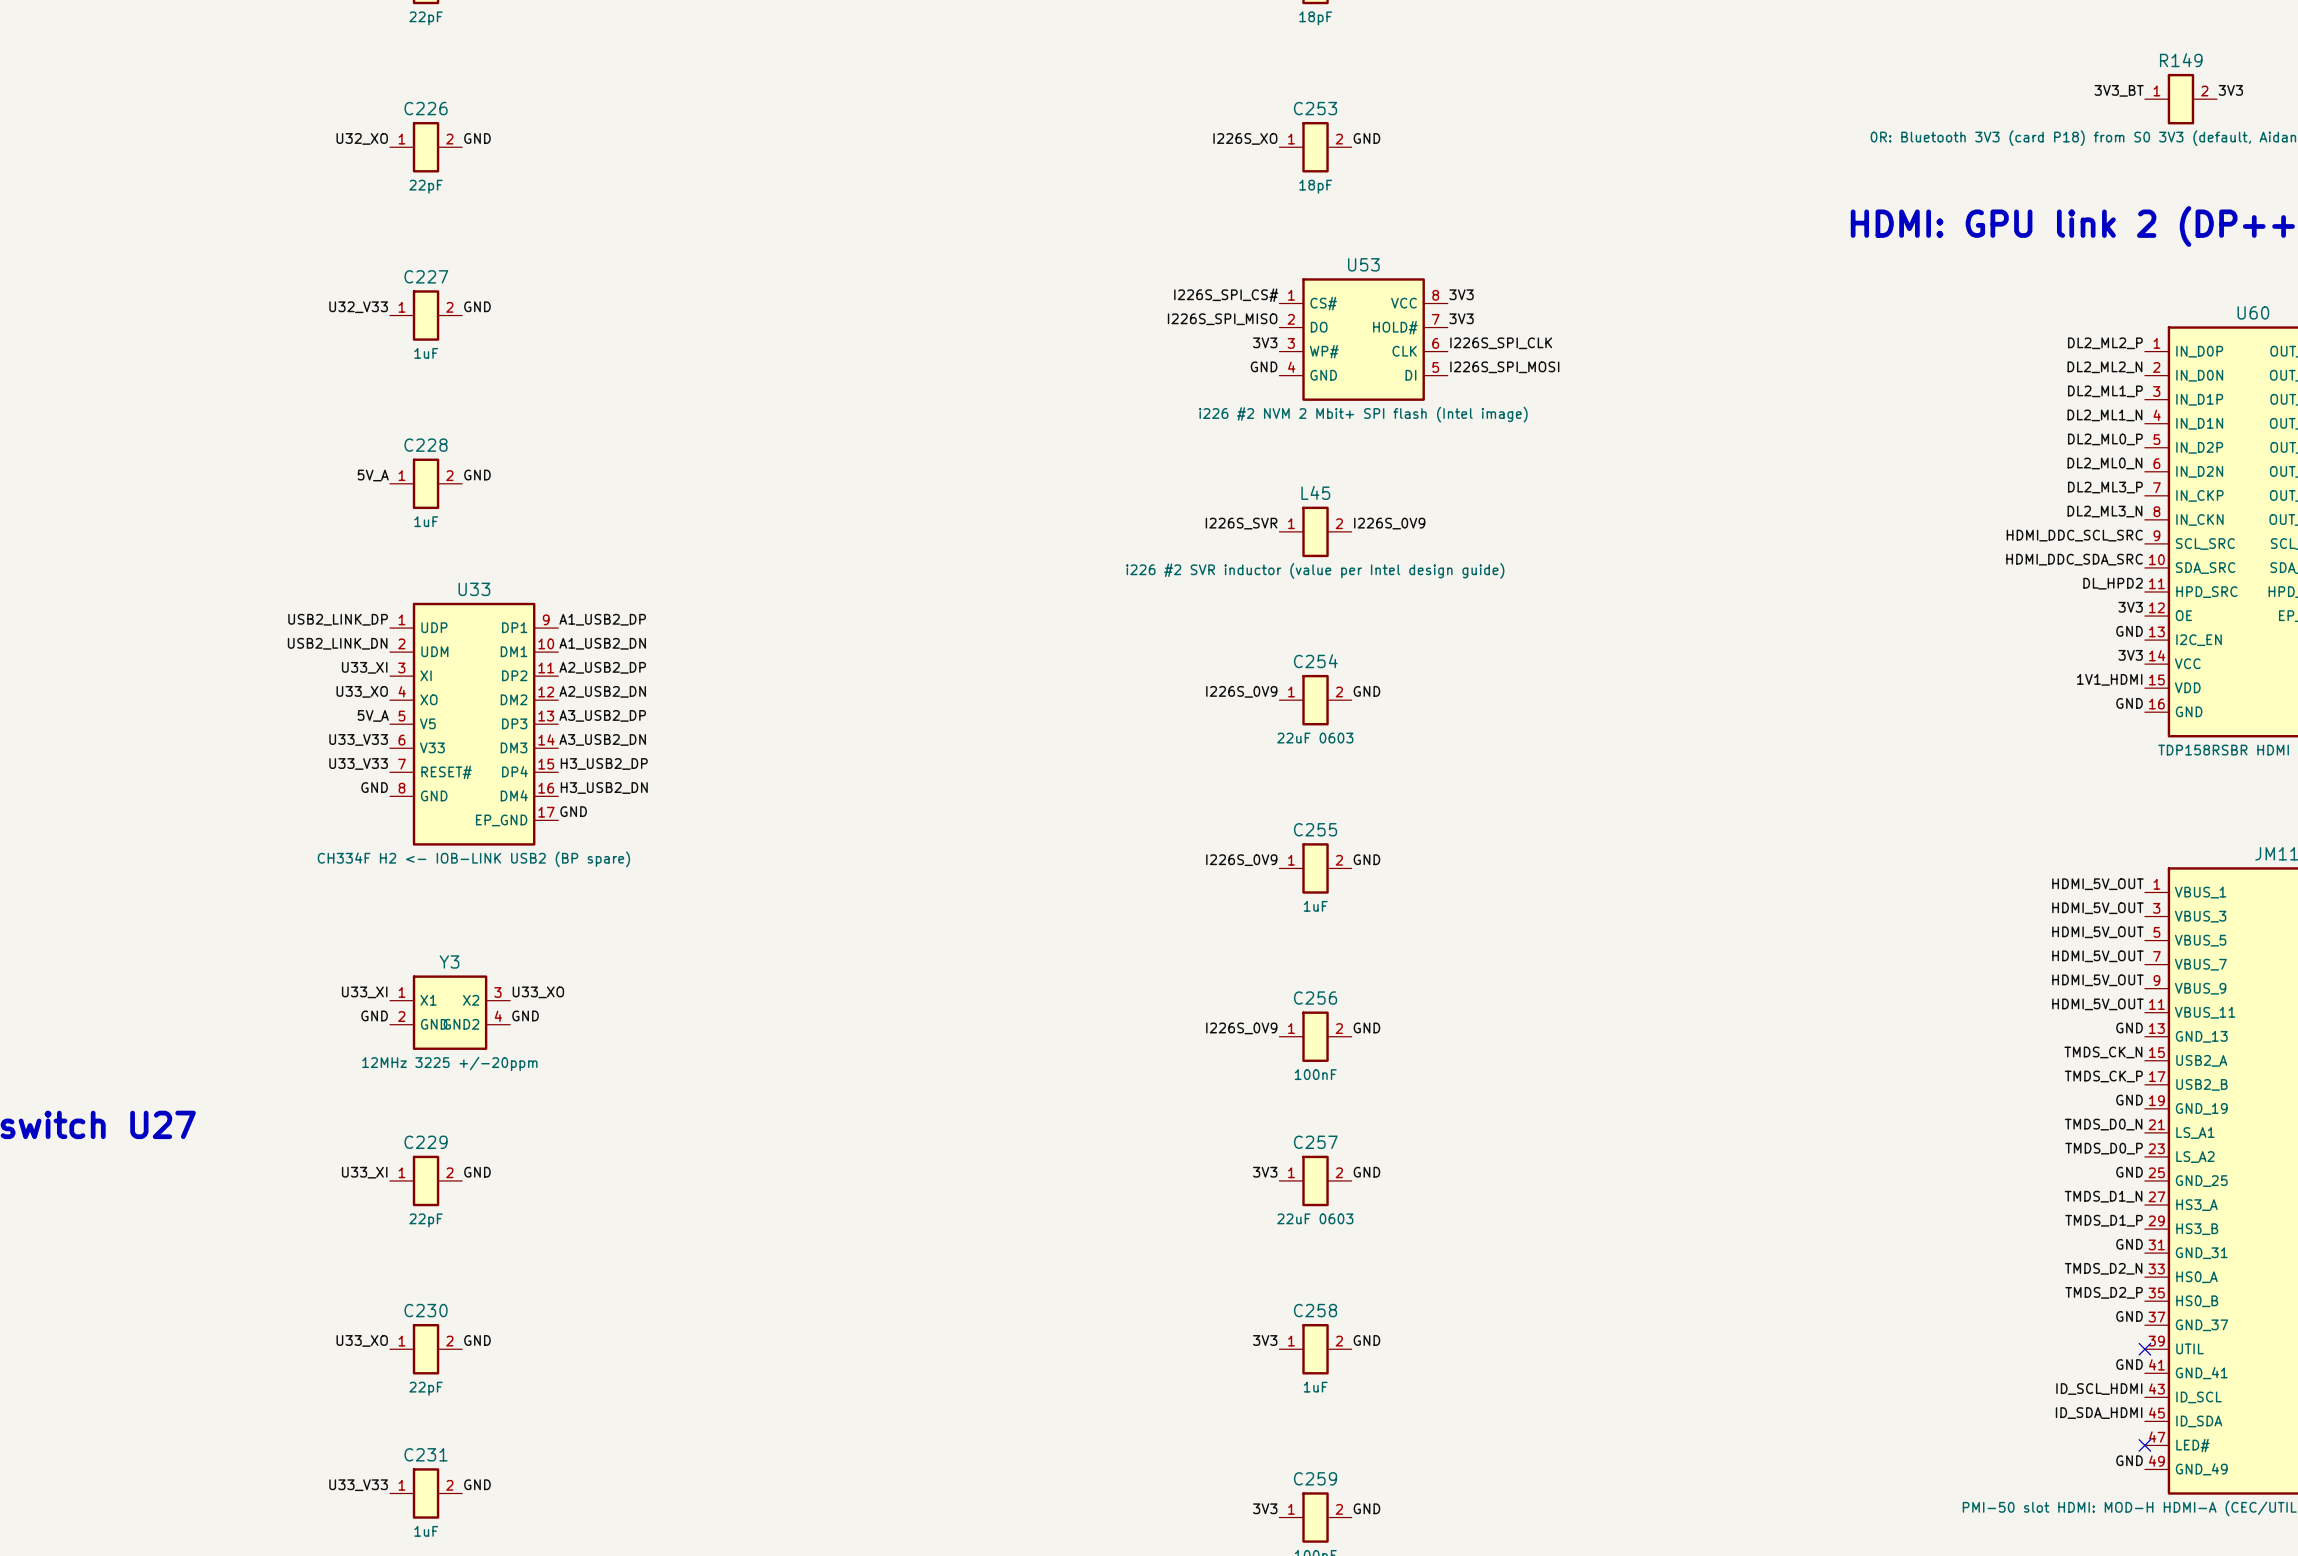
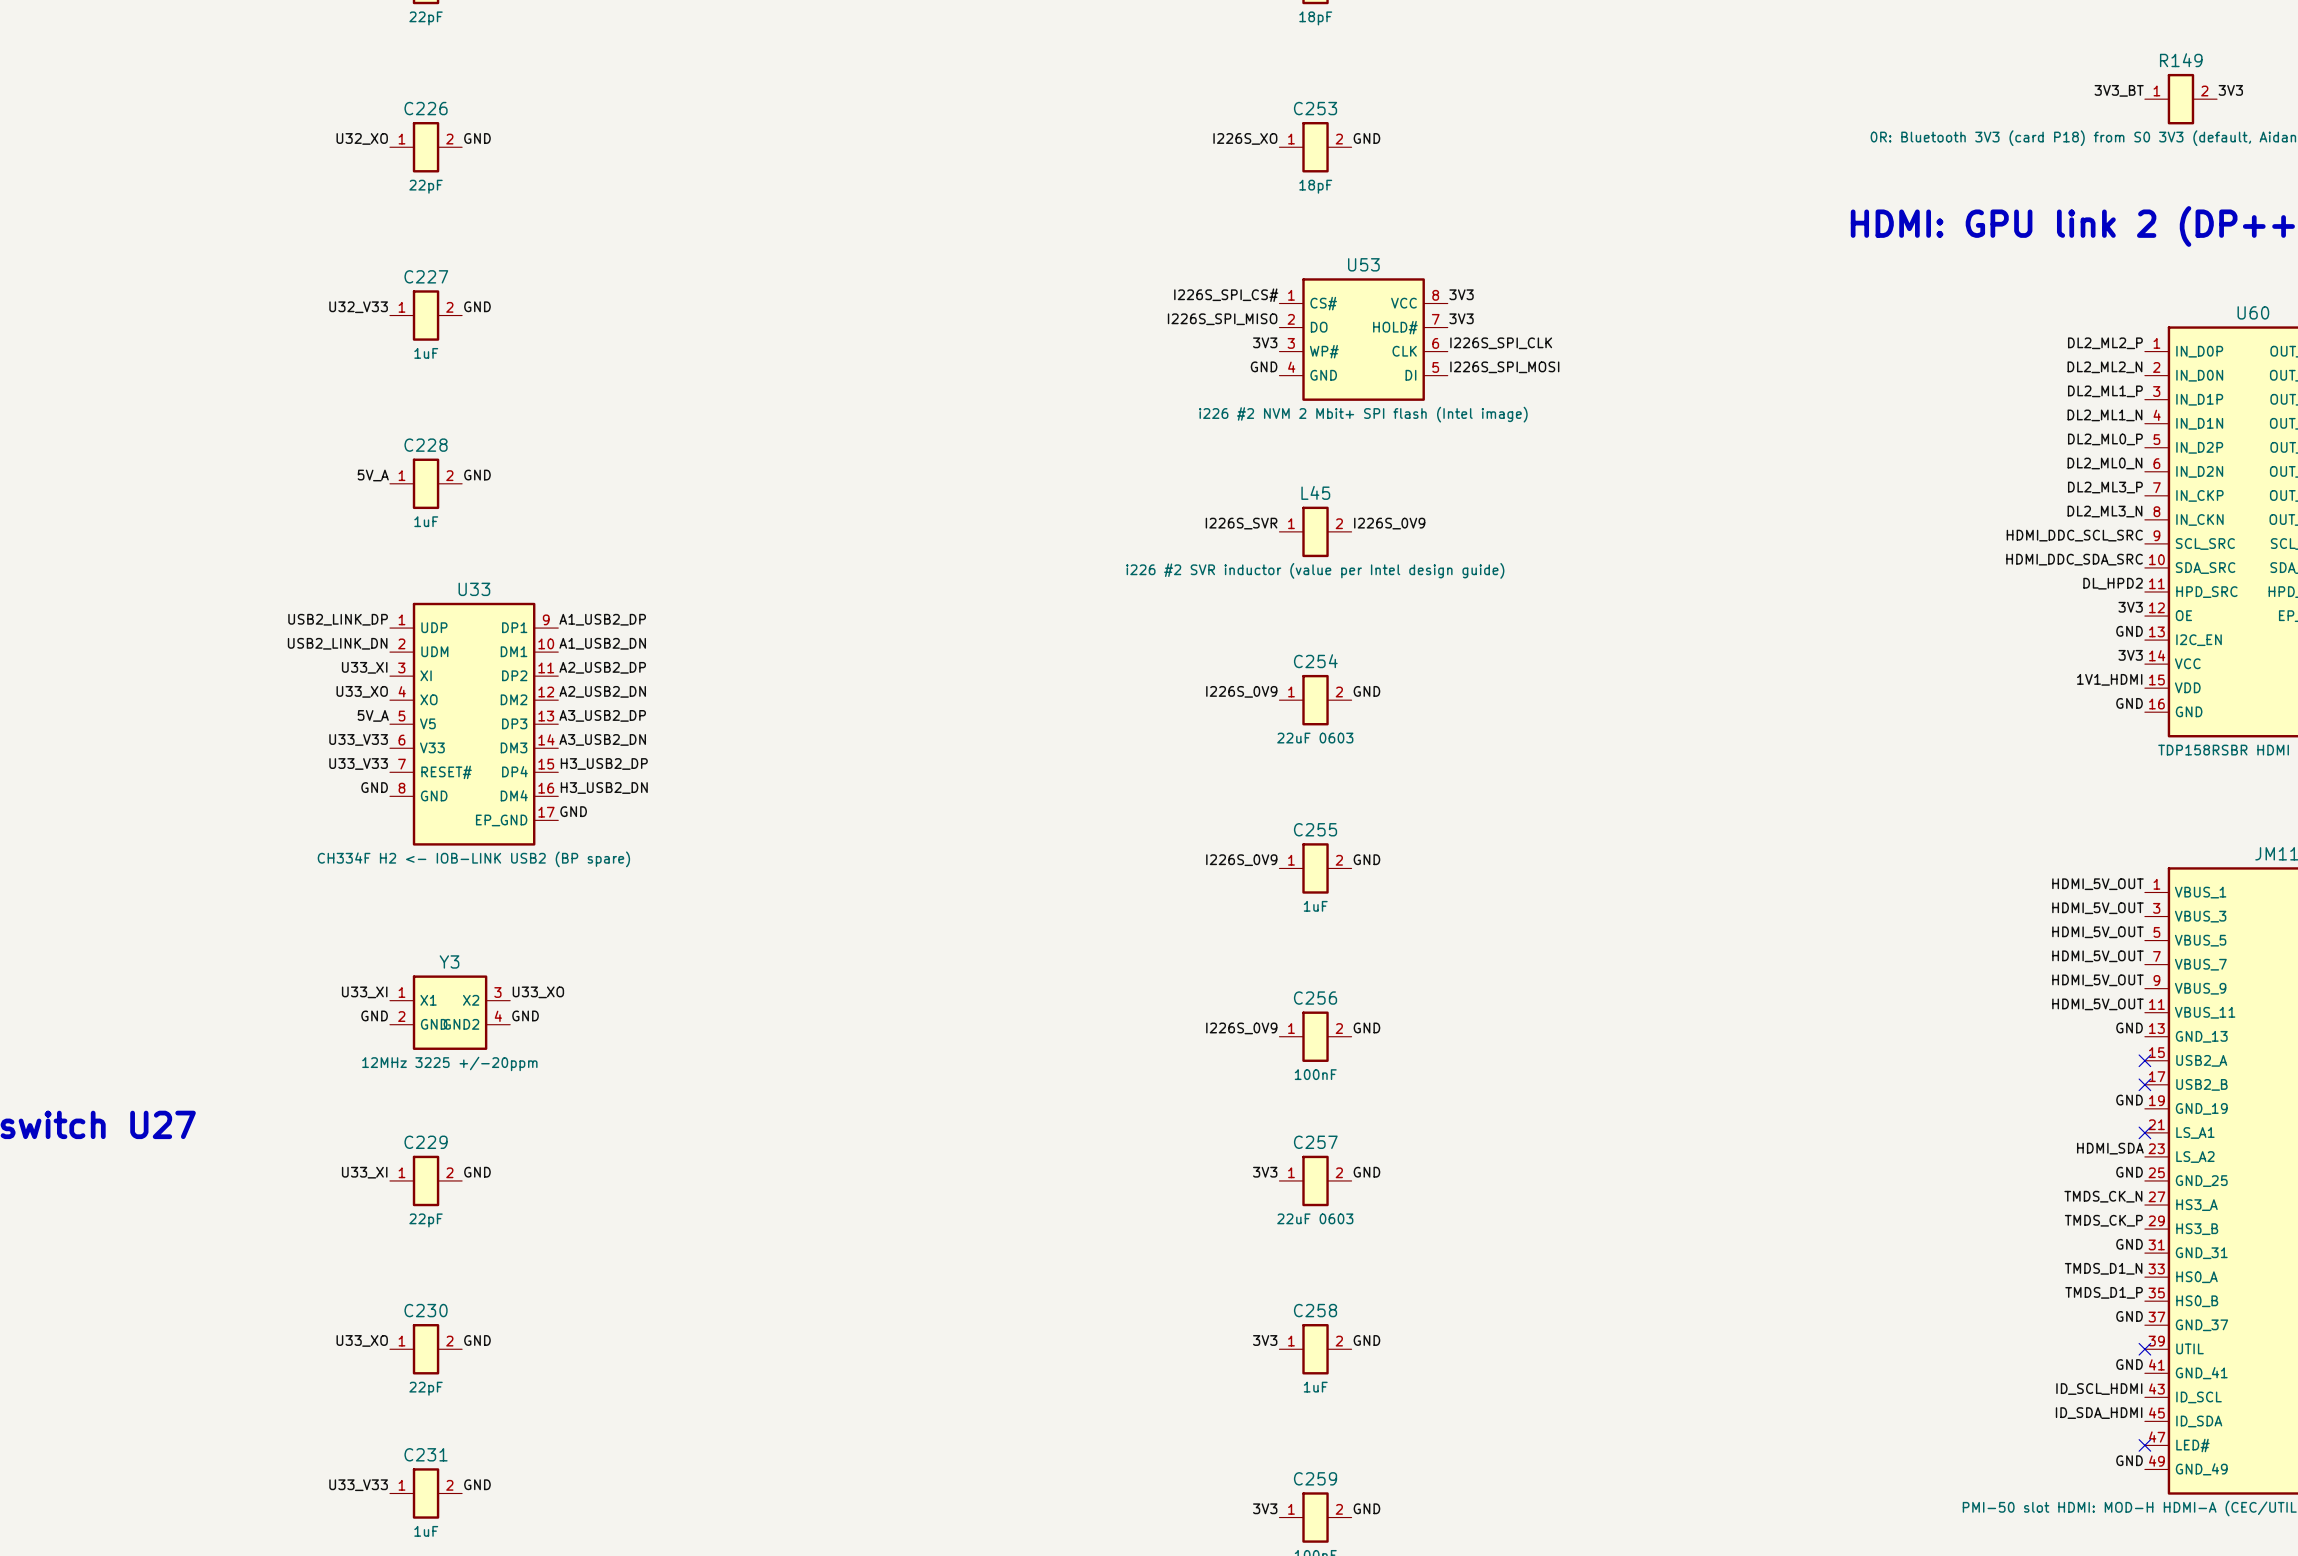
label: TMDS_CK_N (2103, 1052) -> none
no-connect mark: none -> (2144, 1060)
label: TMDS_CK_P (2103, 1076) -> none
no-connect mark: none -> (2144, 1084)
label: TMDS_D0_N (2103, 1124) -> none
no-connect mark: none -> (2144, 1132)
label: TMDS_D0_P (2104, 1148) -> HDMI_SDA (2110, 1148)
label: TMDS_D1_N (2103, 1196) -> TMDS_CK_N (2103, 1196)
label: TMDS_D1_P (2104, 1220) -> TMDS_CK_P (2103, 1220)
label: TMDS_D2_N (2103, 1268) -> TMDS_D1_N (2103, 1268)
label: TMDS_D2_P (2104, 1292) -> TMDS_D1_P (2104, 1292)

